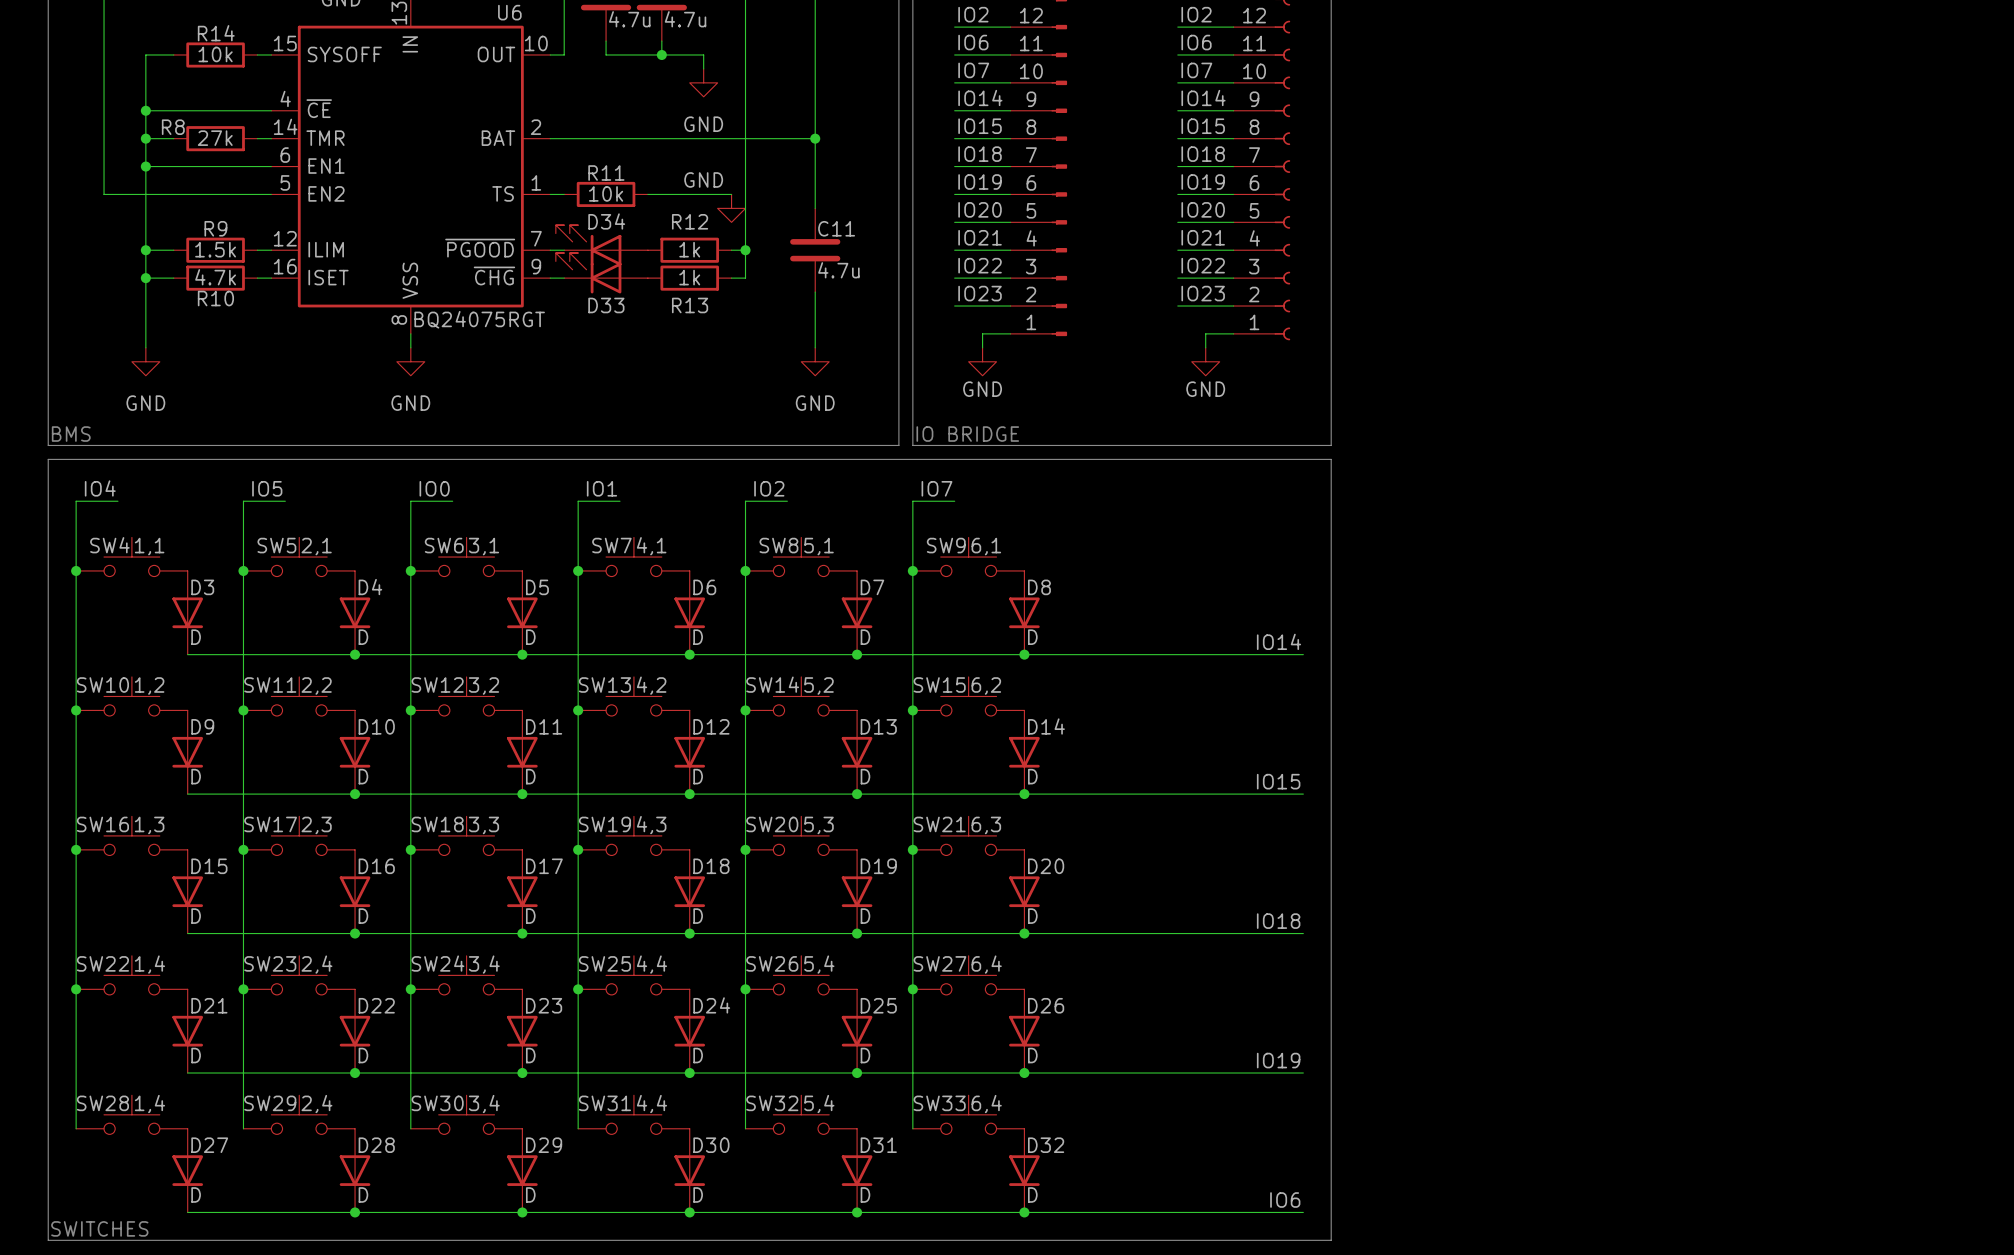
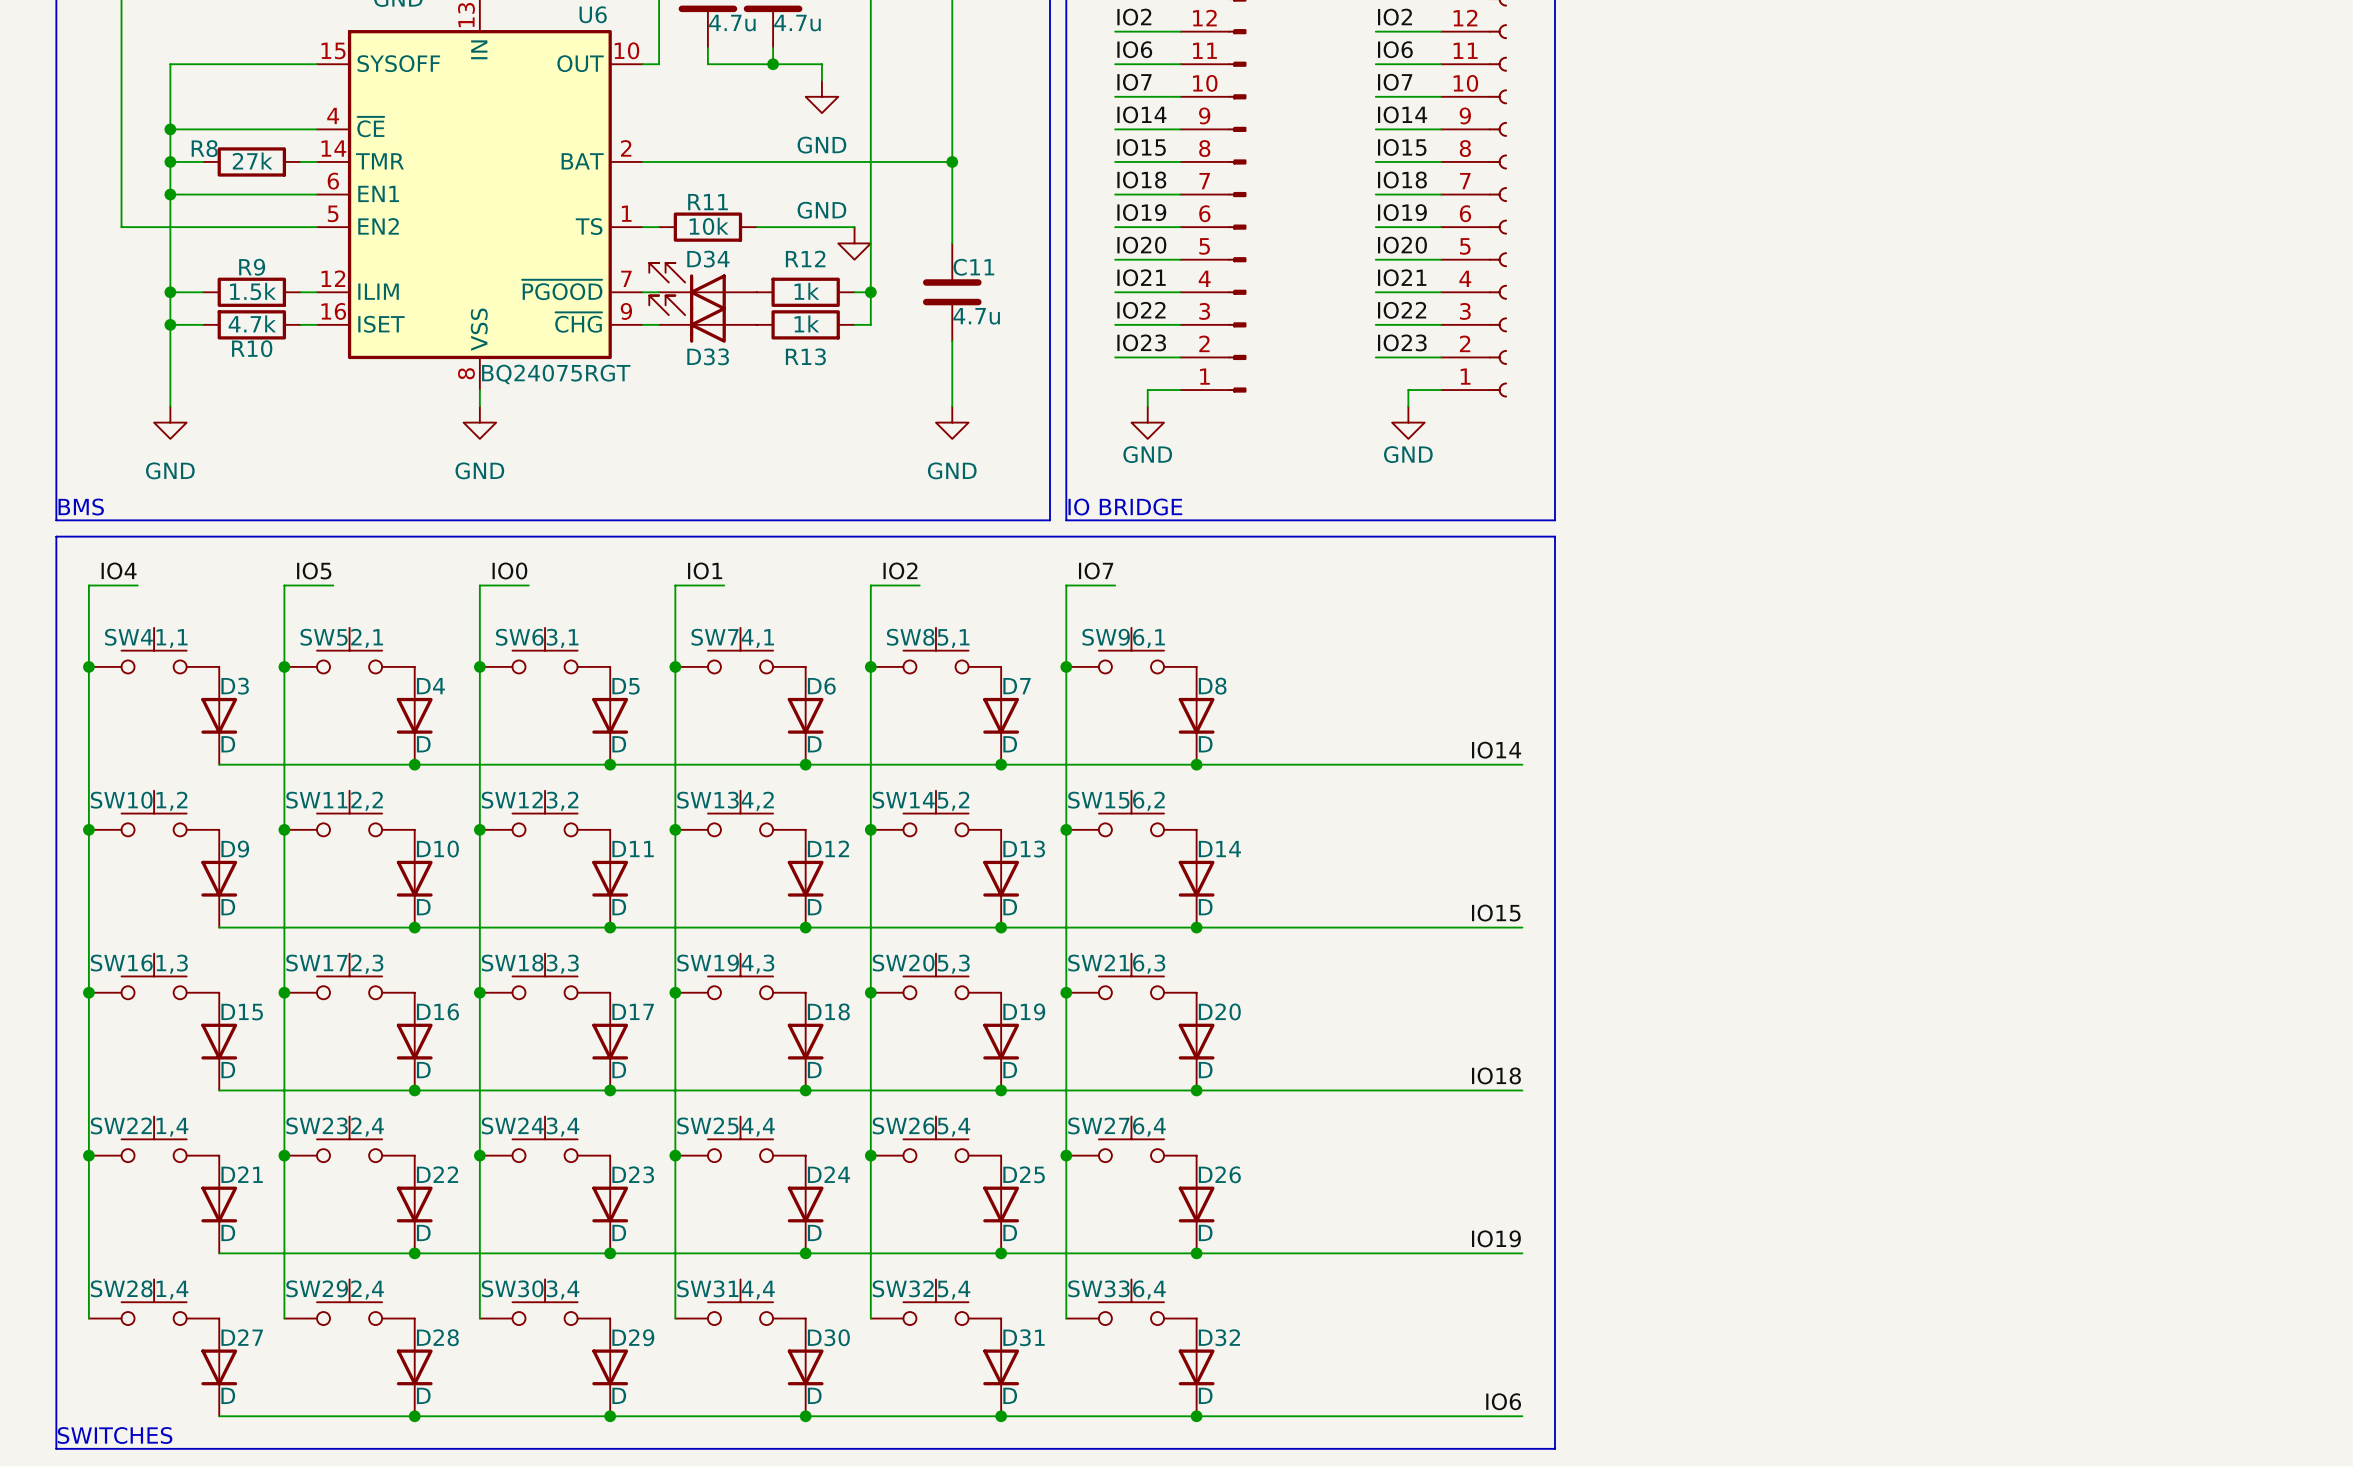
wire: none -> (202, 64) (300, 64)
R14: 10k (215, 54) -> none

